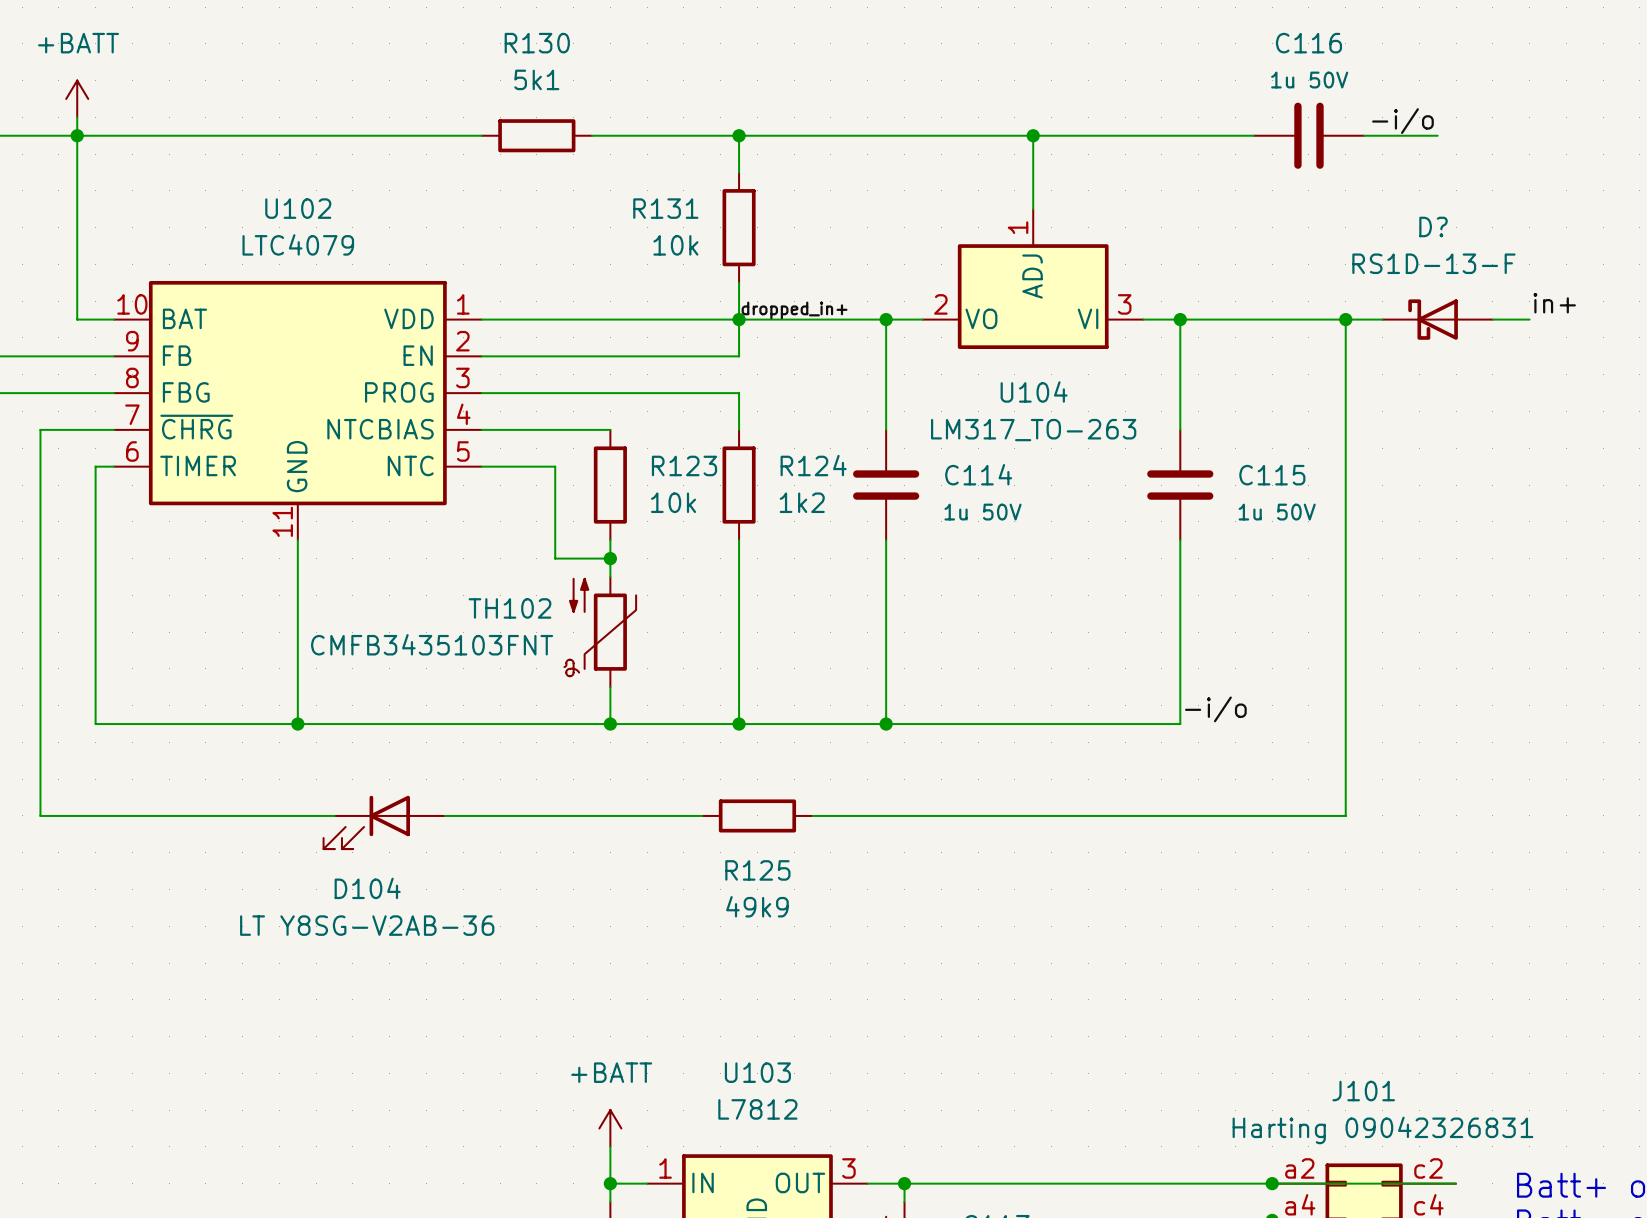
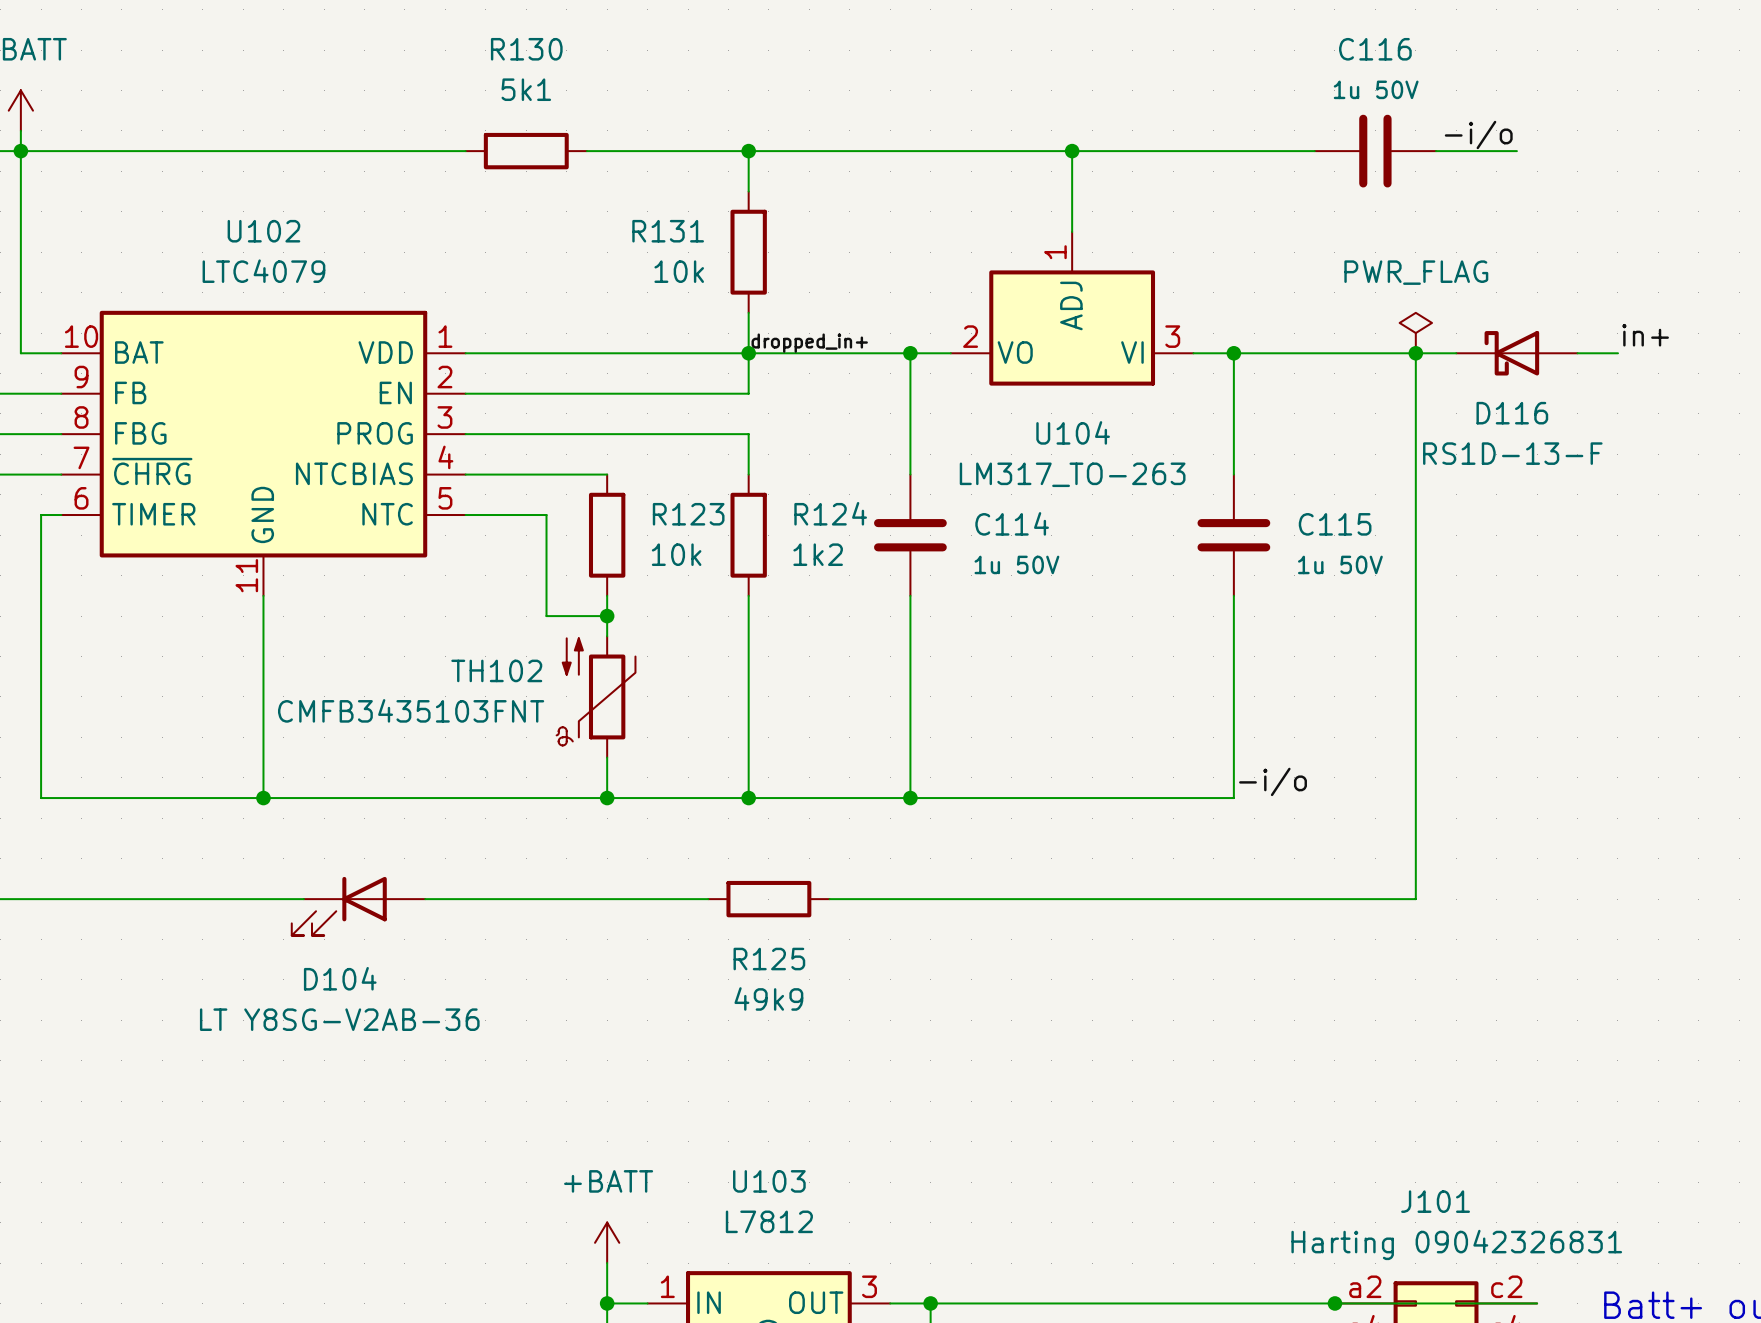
D? name: D? (1433, 226) -> D116 (1512, 413)
D? value position: RS1D-13-F (1433, 263) -> RS1D-13-F (1512, 453)
power symbol: none -> PWR_FLAG (1415, 333)

